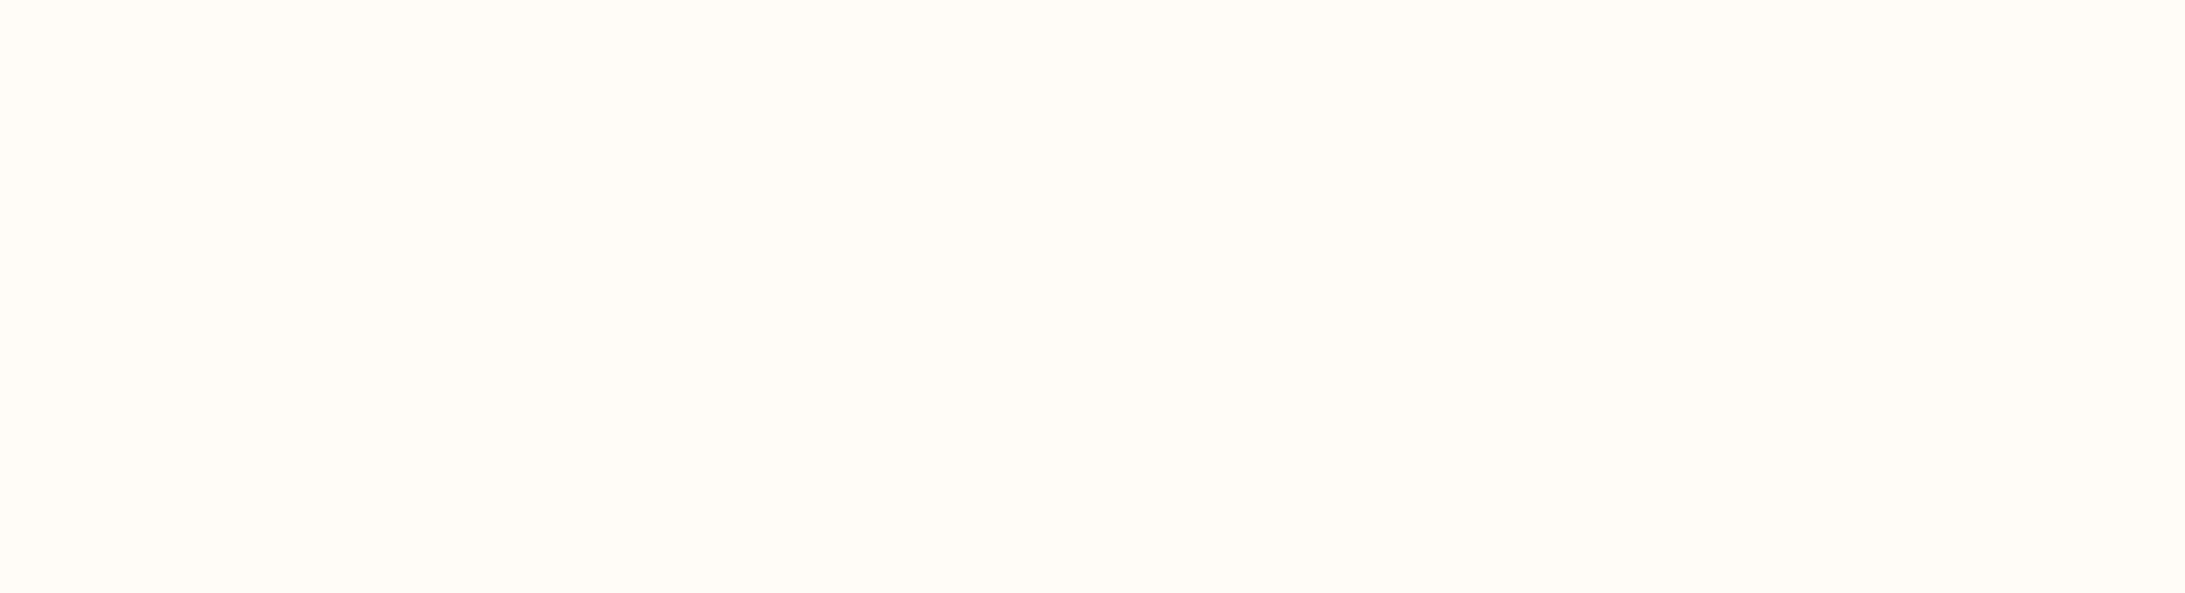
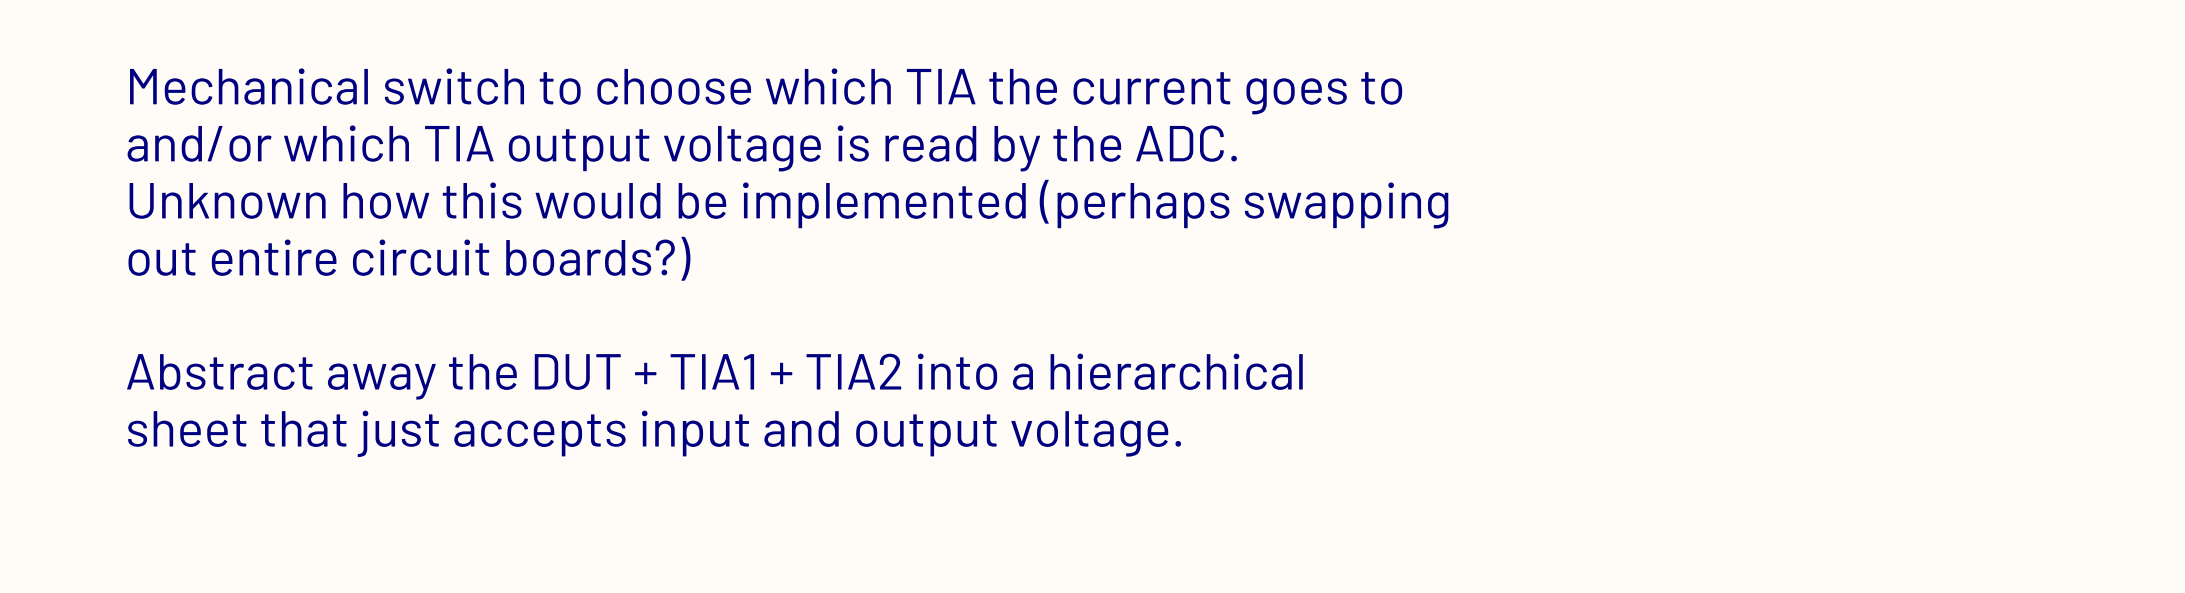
text: none -> Mechanical switch to choose which TIA the current goes to (766, 91)
text: none -> and/or which TIA output voltage is read by the ADC. (682, 148)
text: none -> Unknown how this would be implemented (perhaps swapping (788, 204)
text: none -> out entire circuit boards?) (409, 258)
text: none -> Abstract away the DUT + TIA1 + TIA2 into a hierarchical (714, 376)
text: none -> sheet that just accepts input and output voltage. (654, 433)

